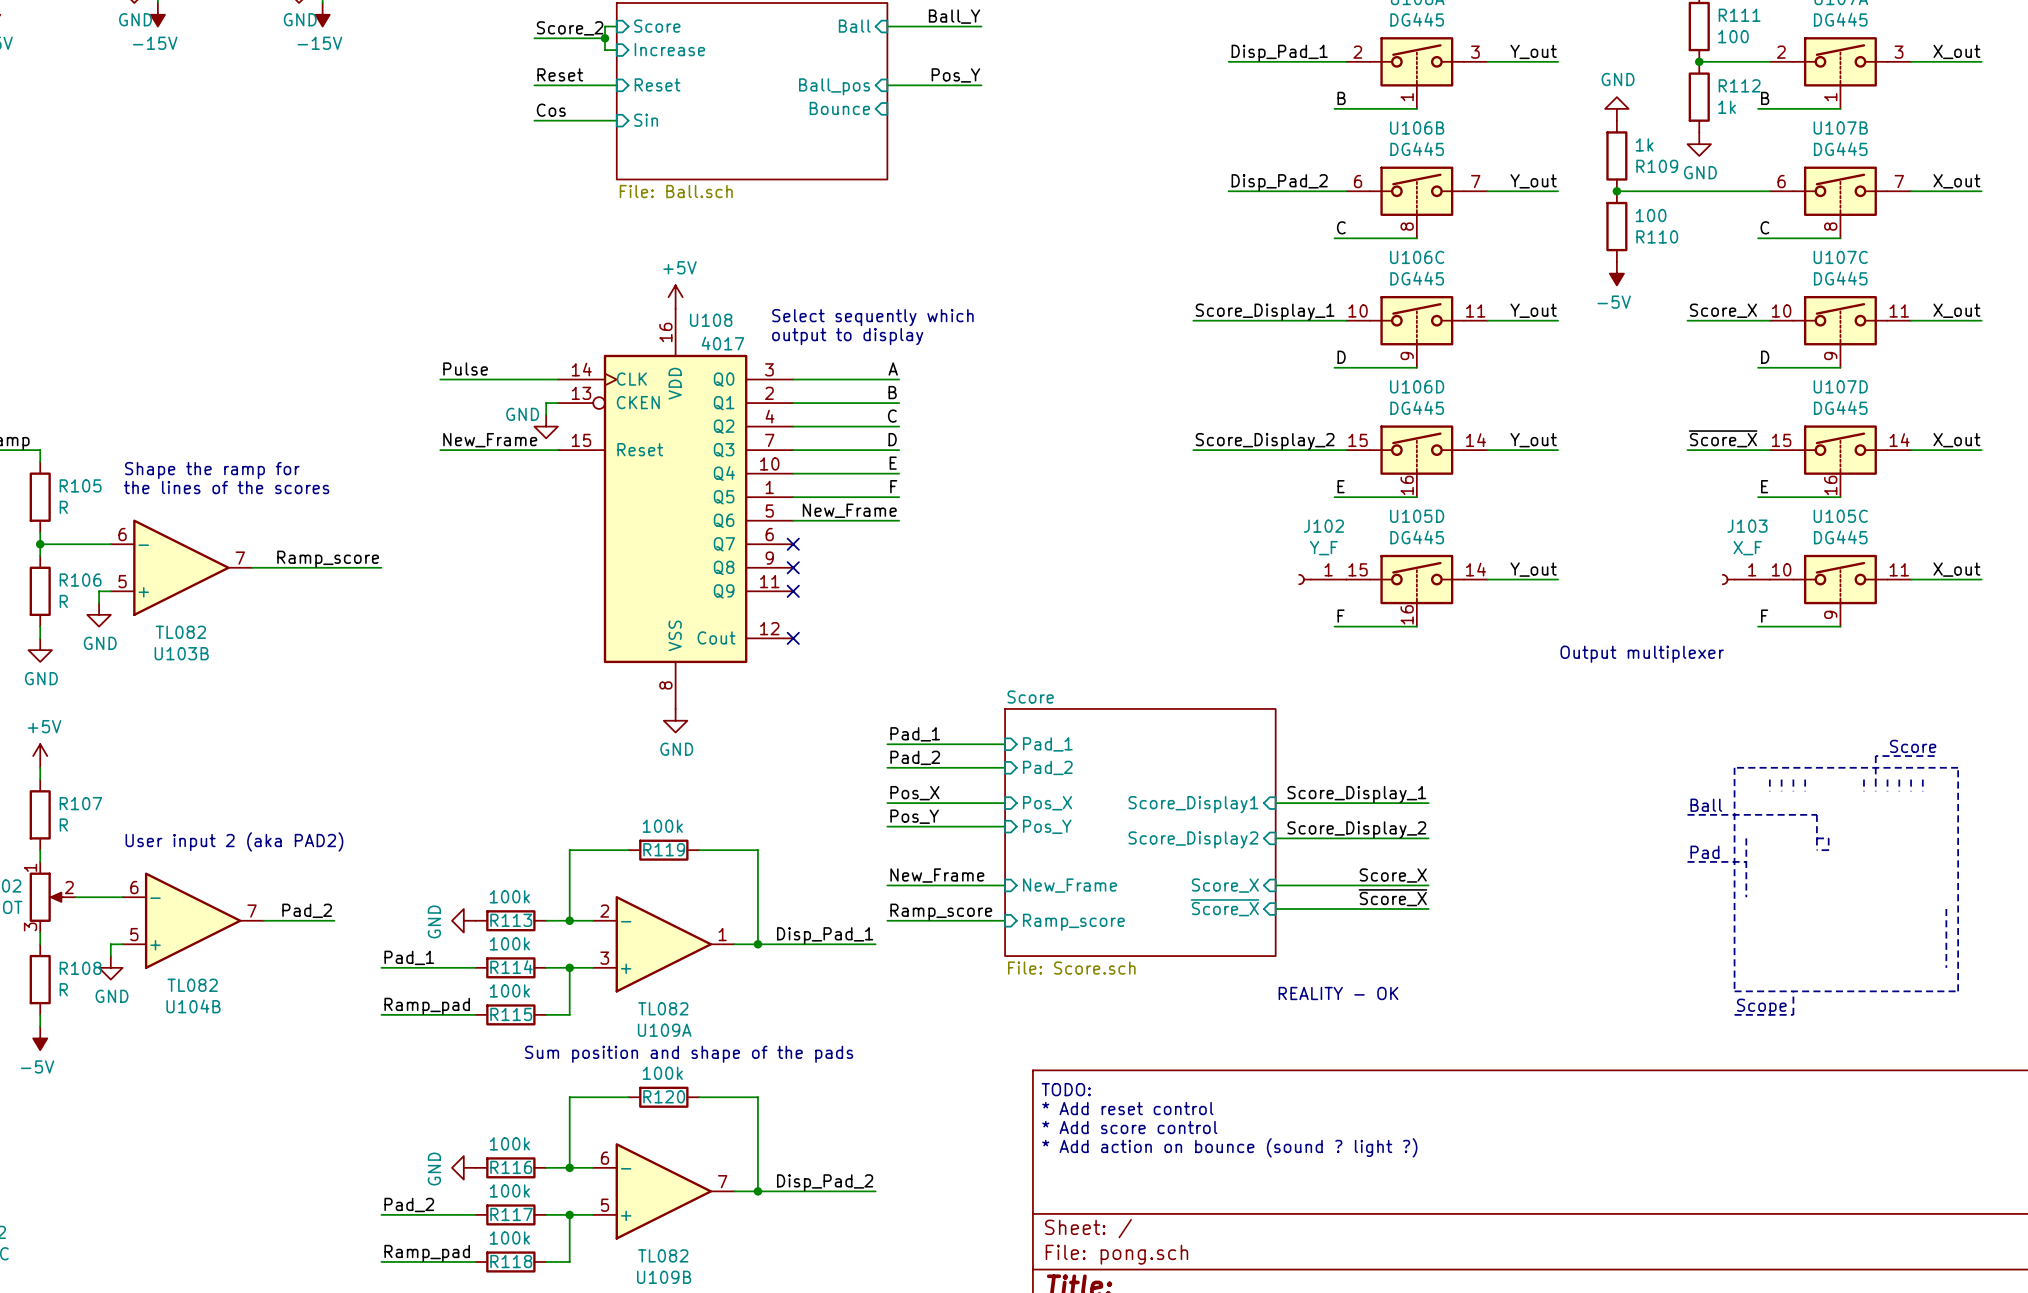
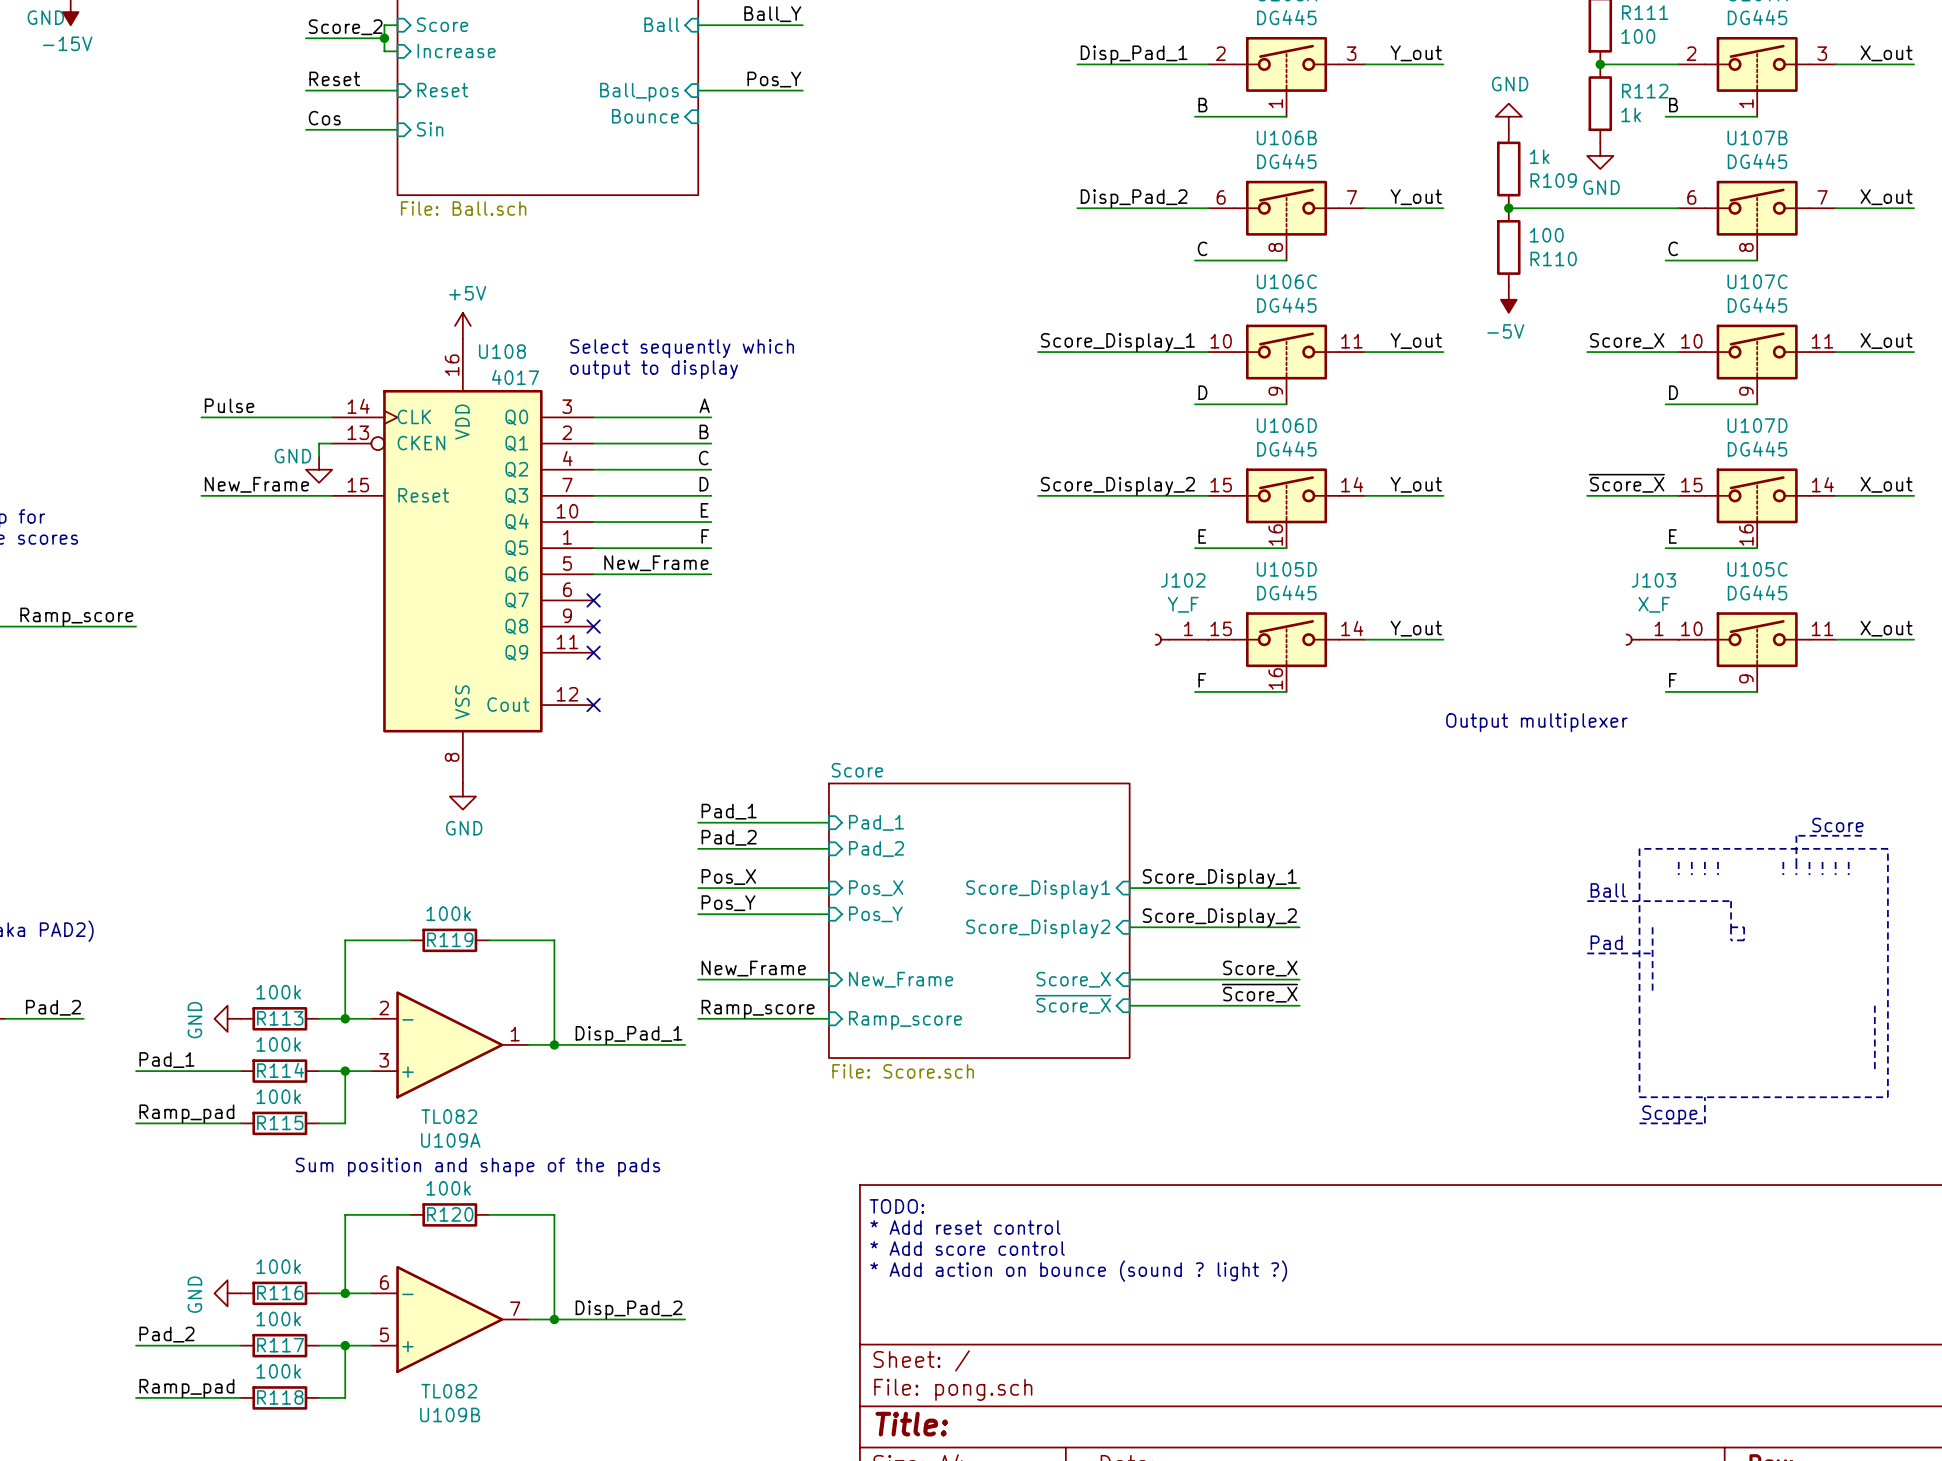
text: REALITY - OK (1338, 993) -> none

